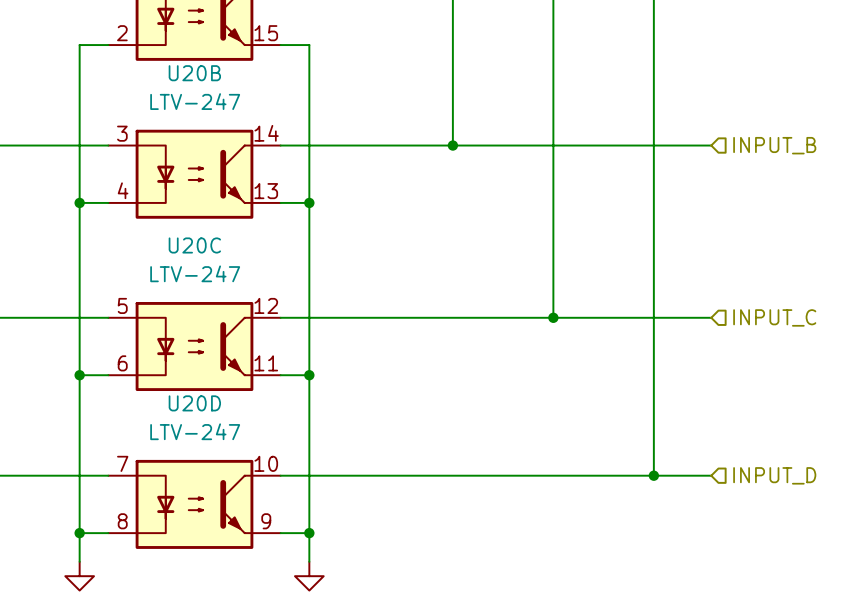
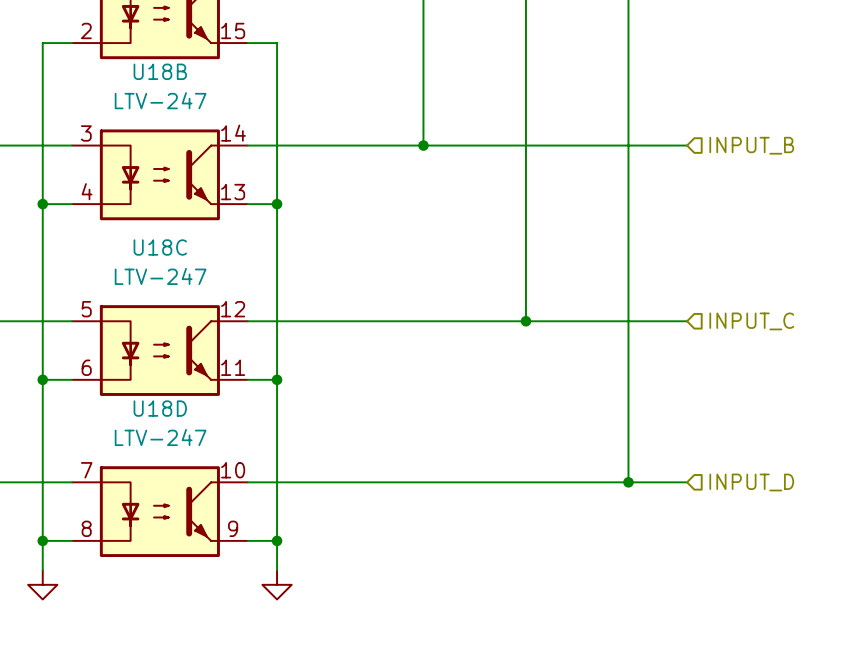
U20B name: U20B (194, 73) -> U18B (160, 71)
U20C name: U20C (194, 245) -> U18C (160, 247)
U20D name: U20D (194, 403) -> U18D (160, 408)

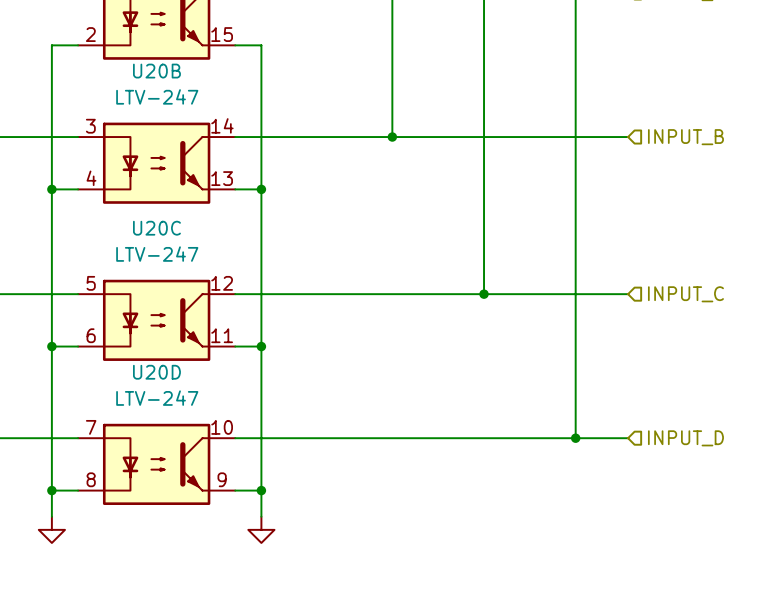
U18B name: U18B (160, 71) -> U20B (156, 71)
U18C name: U18C (160, 247) -> U20C (156, 228)
U18D name: U18D (160, 408) -> U20D (156, 372)

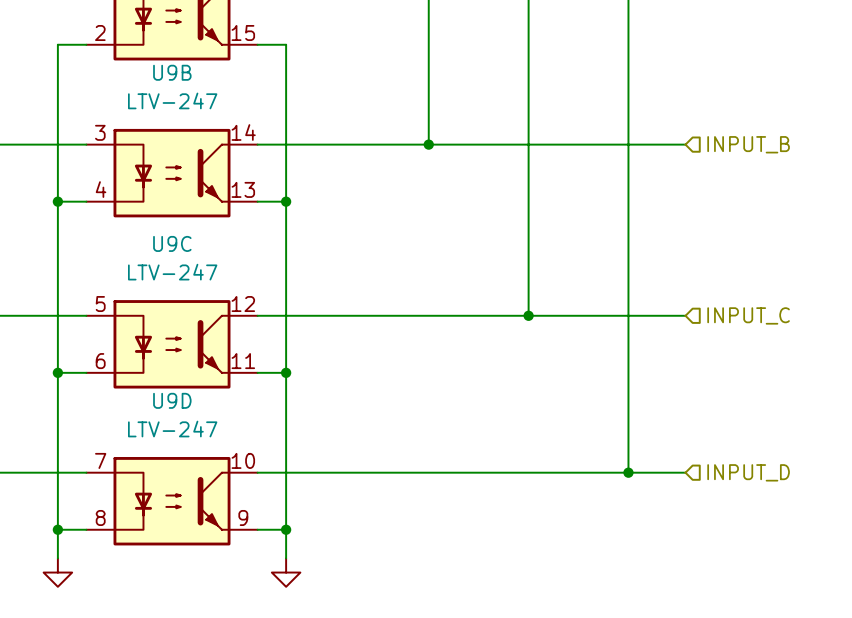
U20B name: U20B (156, 71) -> U9B (172, 72)
U20C name: U20C (156, 228) -> U9C (172, 243)
U20D name: U20D (156, 372) -> U9D (172, 400)

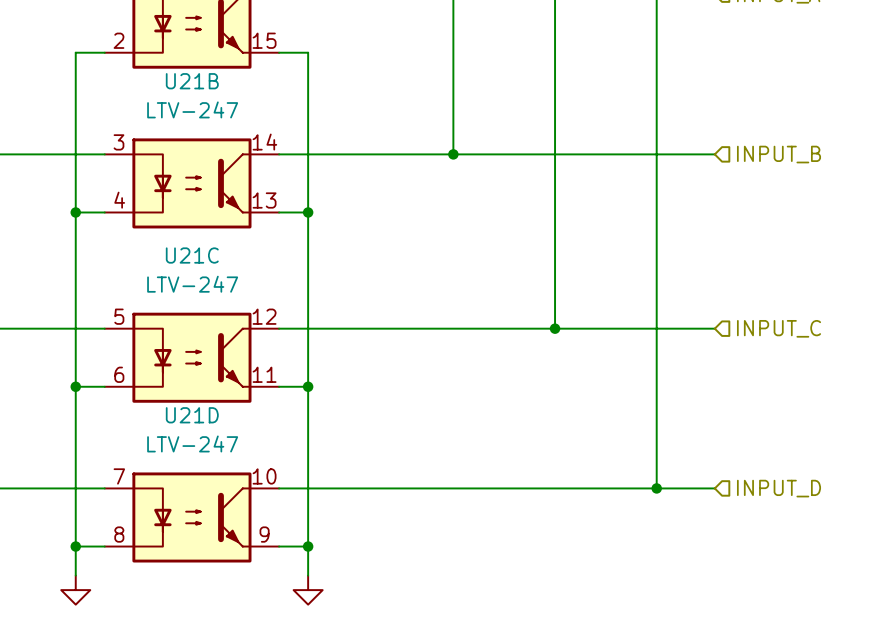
U9B name: U9B (172, 72) -> U21B (192, 81)
U9C name: U9C (172, 243) -> U21C (192, 255)
U9D name: U9D (172, 400) -> U21D (192, 415)

